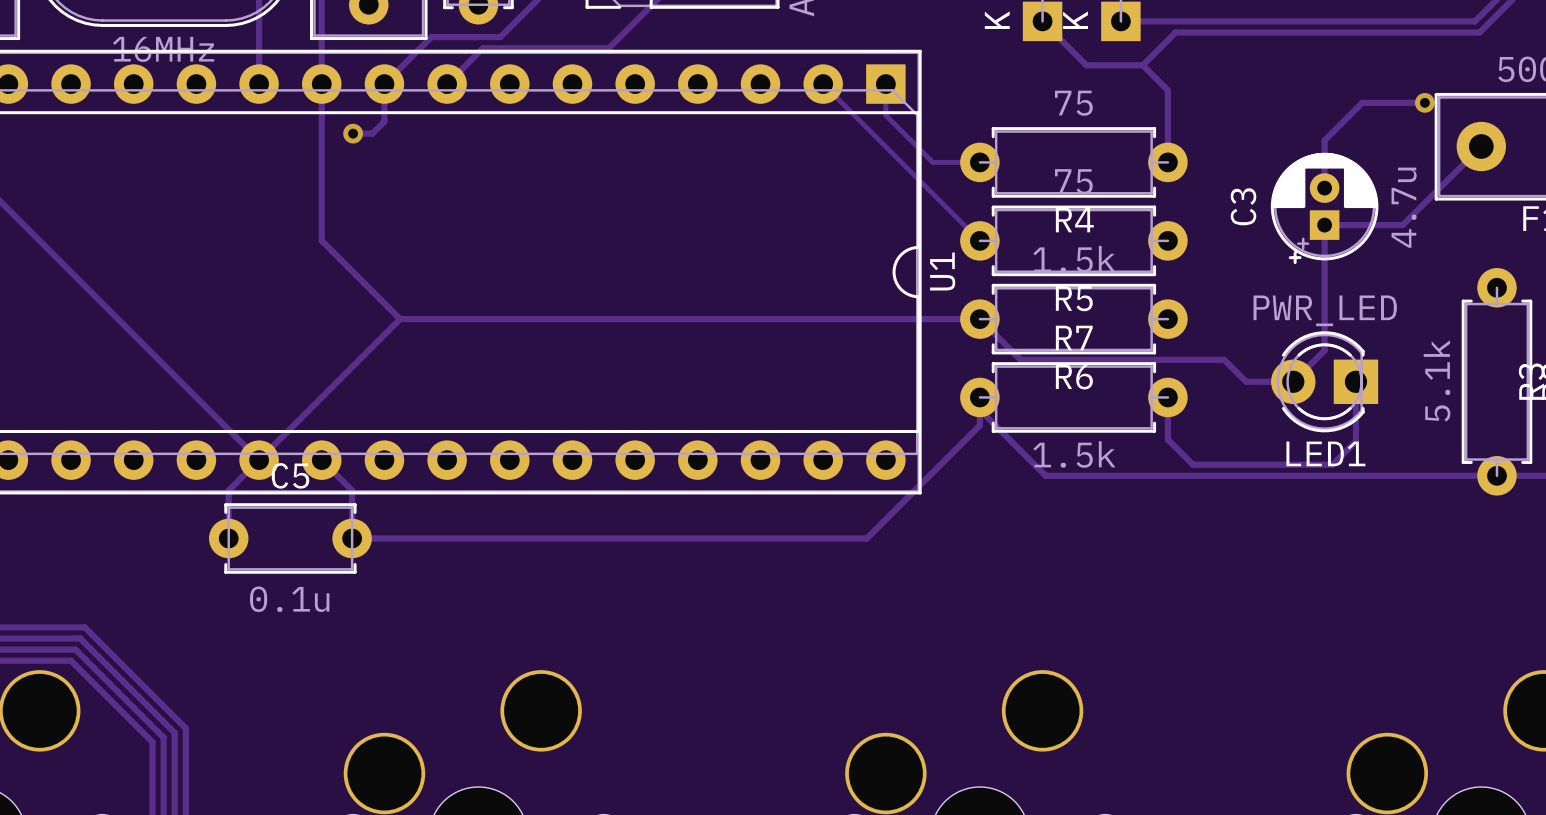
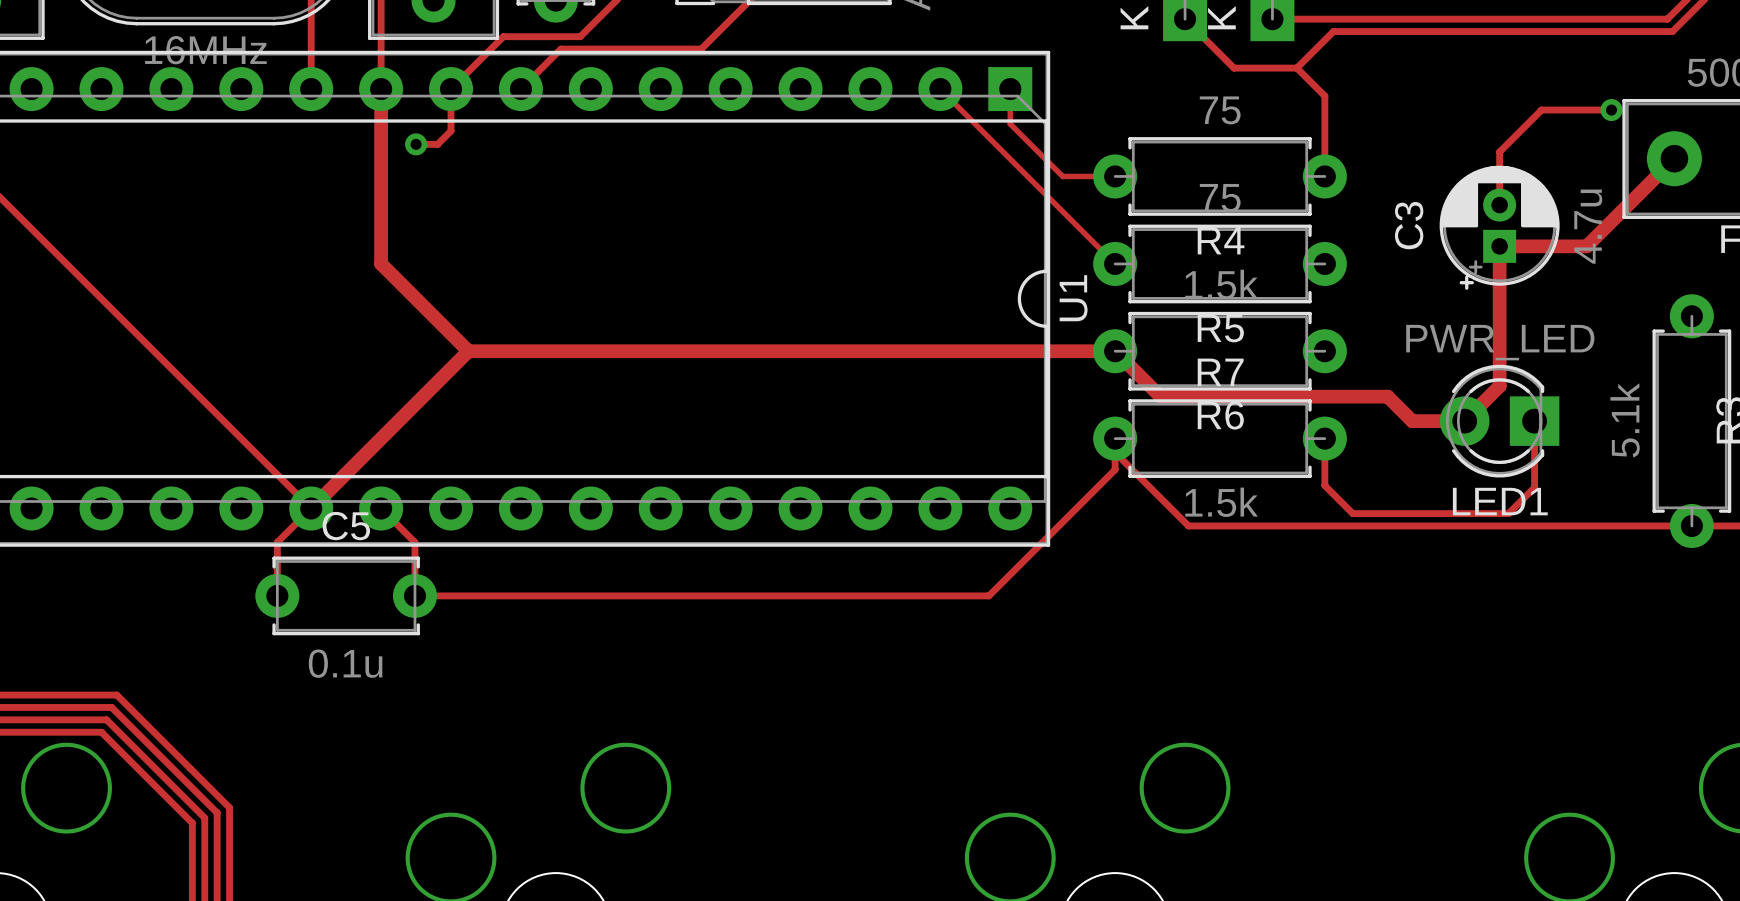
track width: thin (321, 84) (321, 240) (400, 319) -> thick (381, 89) (381, 263) (468, 351)
track width: thin (1481, 146) (1402, 225) (1324, 225) (1324, 350) (1293, 381) (1246, 381) (1224, 359) (1020, 359) (979, 319) (400, 319) -> thick (1674, 158) (1586, 246) (1499, 246) (1499, 386) (1464, 421) (1412, 421) (1387, 396) (1160, 396) (1115, 351) (468, 351)
track width: thin (400, 319) (259, 460) -> thick (468, 351) (311, 508)

